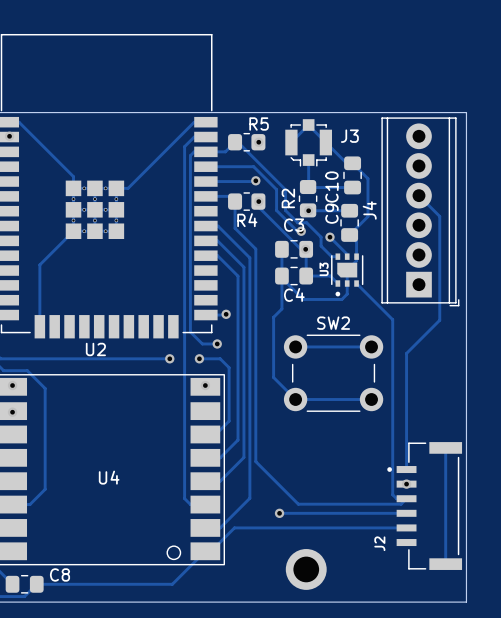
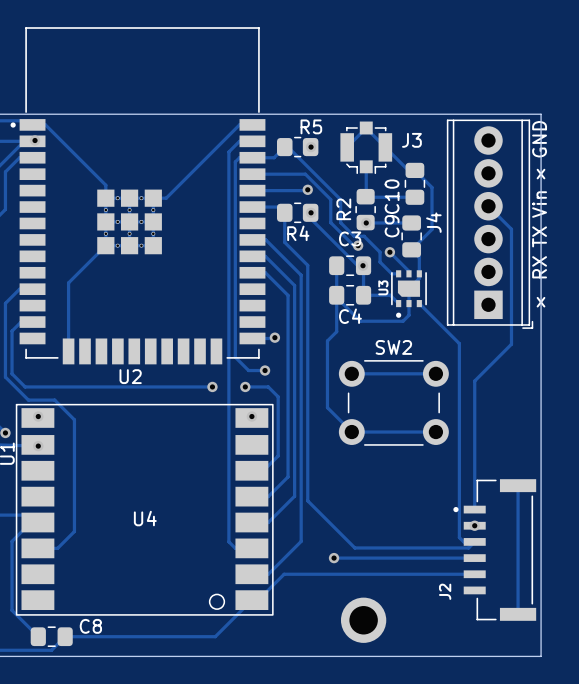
text: none -> GND (539, 139)
text: none -> x (541, 174)
text: none -> Vin (539, 204)
text: none -> TX (539, 236)
text: none -> RX (539, 267)
text: none -> x (541, 302)

